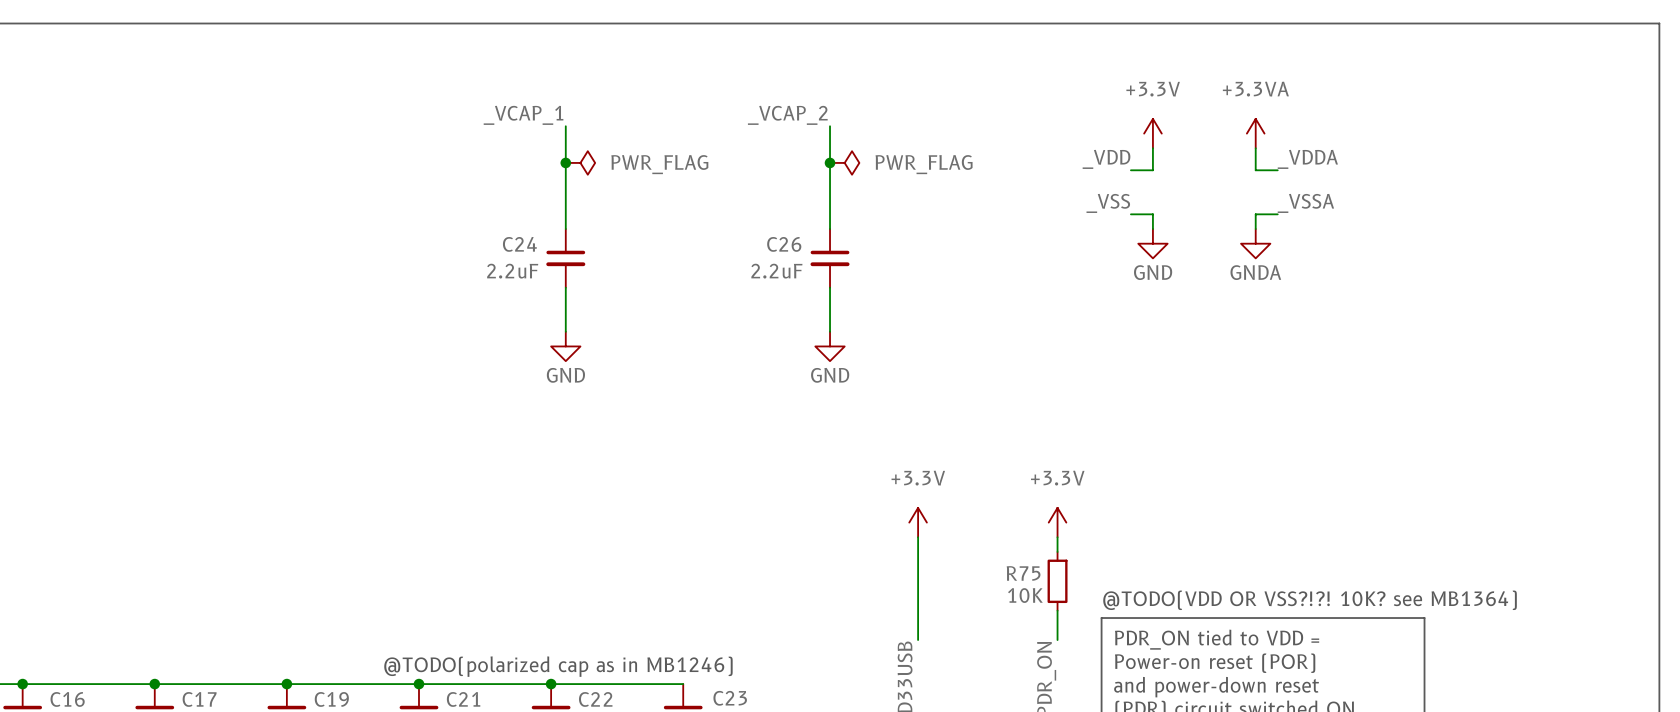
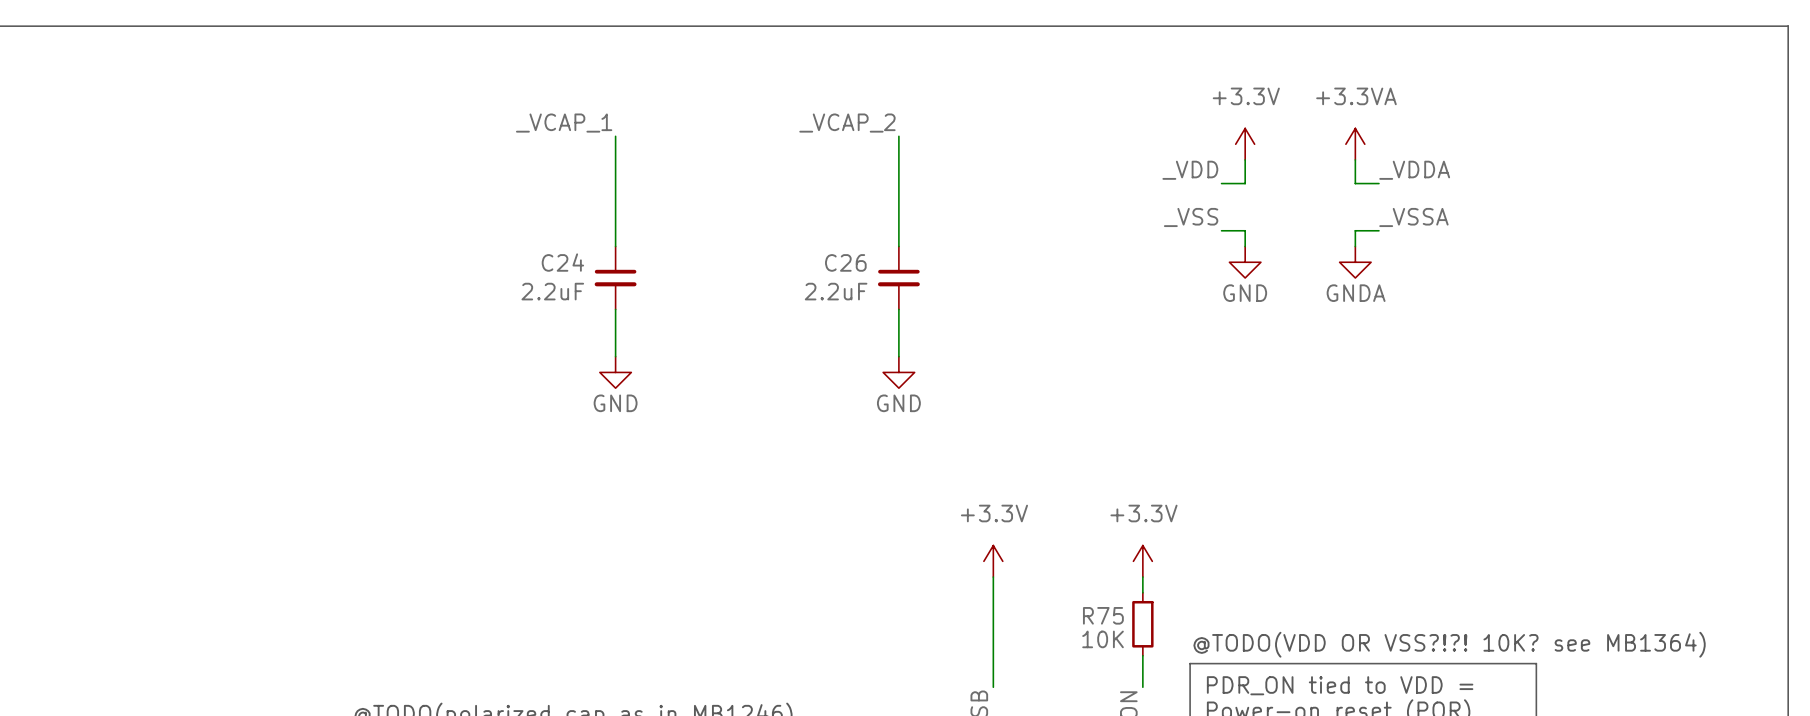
junction: (565, 162) -> none
power symbol: PWR_FLAG (580, 162) -> none
junction: (830, 162) -> none
power symbol: PWR_FLAG (844, 162) -> none

